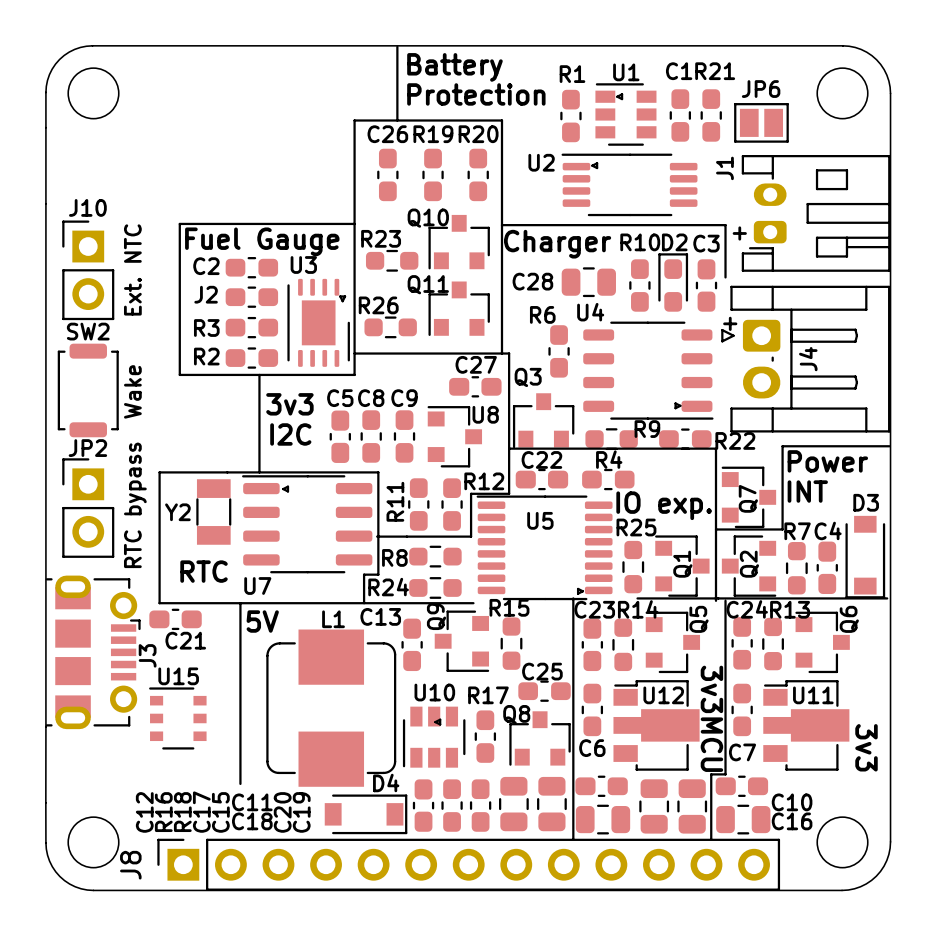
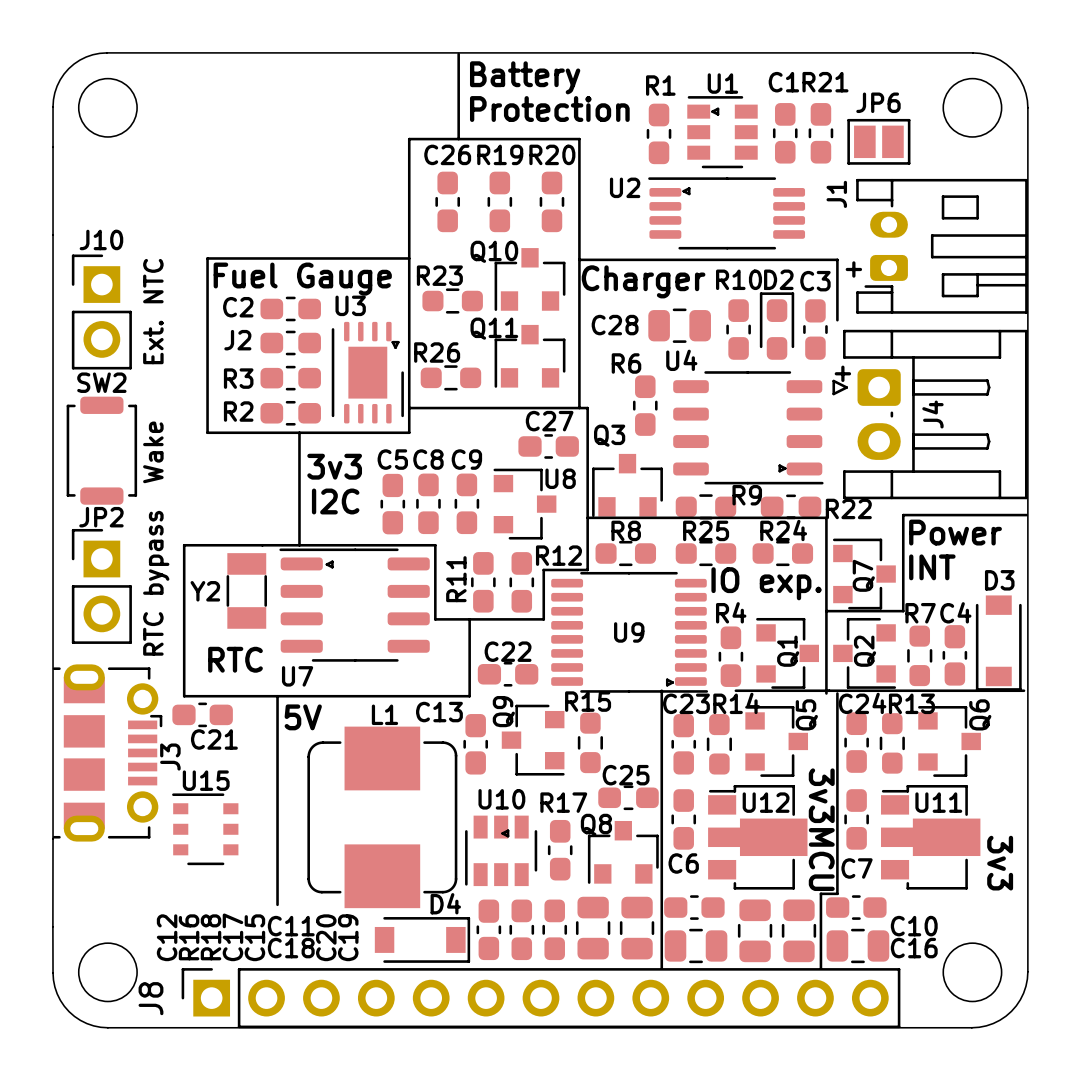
line: (377, 472) (378, 574) (364, 574) (364, 603) -> (435, 545) (435, 619)
C22 position: (541, 479) -> (508, 674)
R4 rotation: 0° (608, 479) -> 90° clockwise (730, 656)
R4 position: (608, 479) -> (730, 656)
U5: (544, 547) -> none
U9: none -> (629, 632)
R8 position: (435, 556) -> (625, 553)
R8 name position: R8 (394, 557) -> R8 (626, 530)
R25 rotation: 0° (633, 567) -> 90° clockwise (705, 553)
R25 position: (633, 567) -> (705, 553)
R24 name position: R24 (388, 587) -> R24 (783, 530)
R24 position: (435, 587) -> (782, 553)
line: (406, 603) (473, 603) -> (469, 696) (469, 619)

